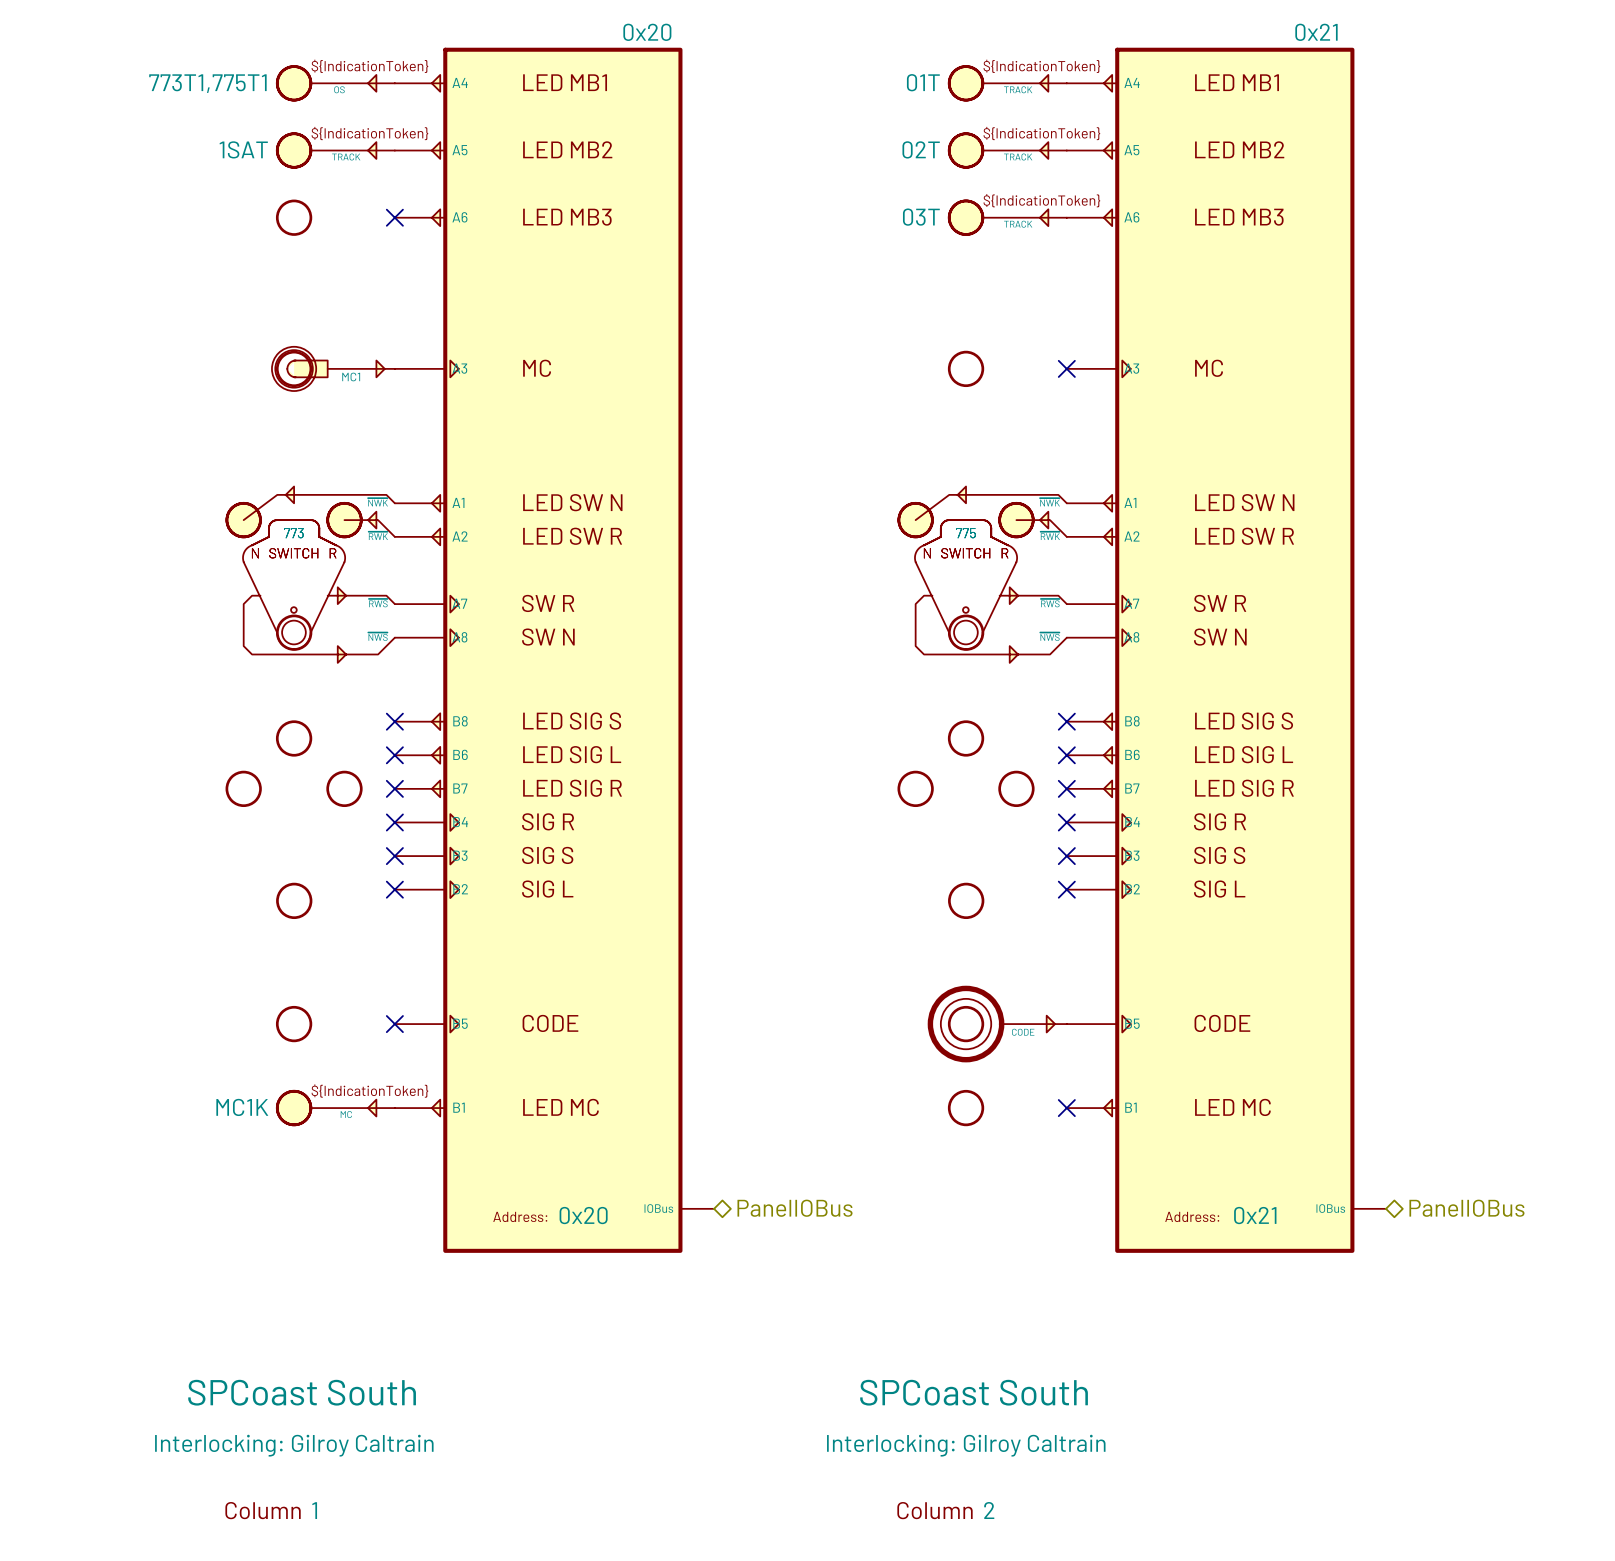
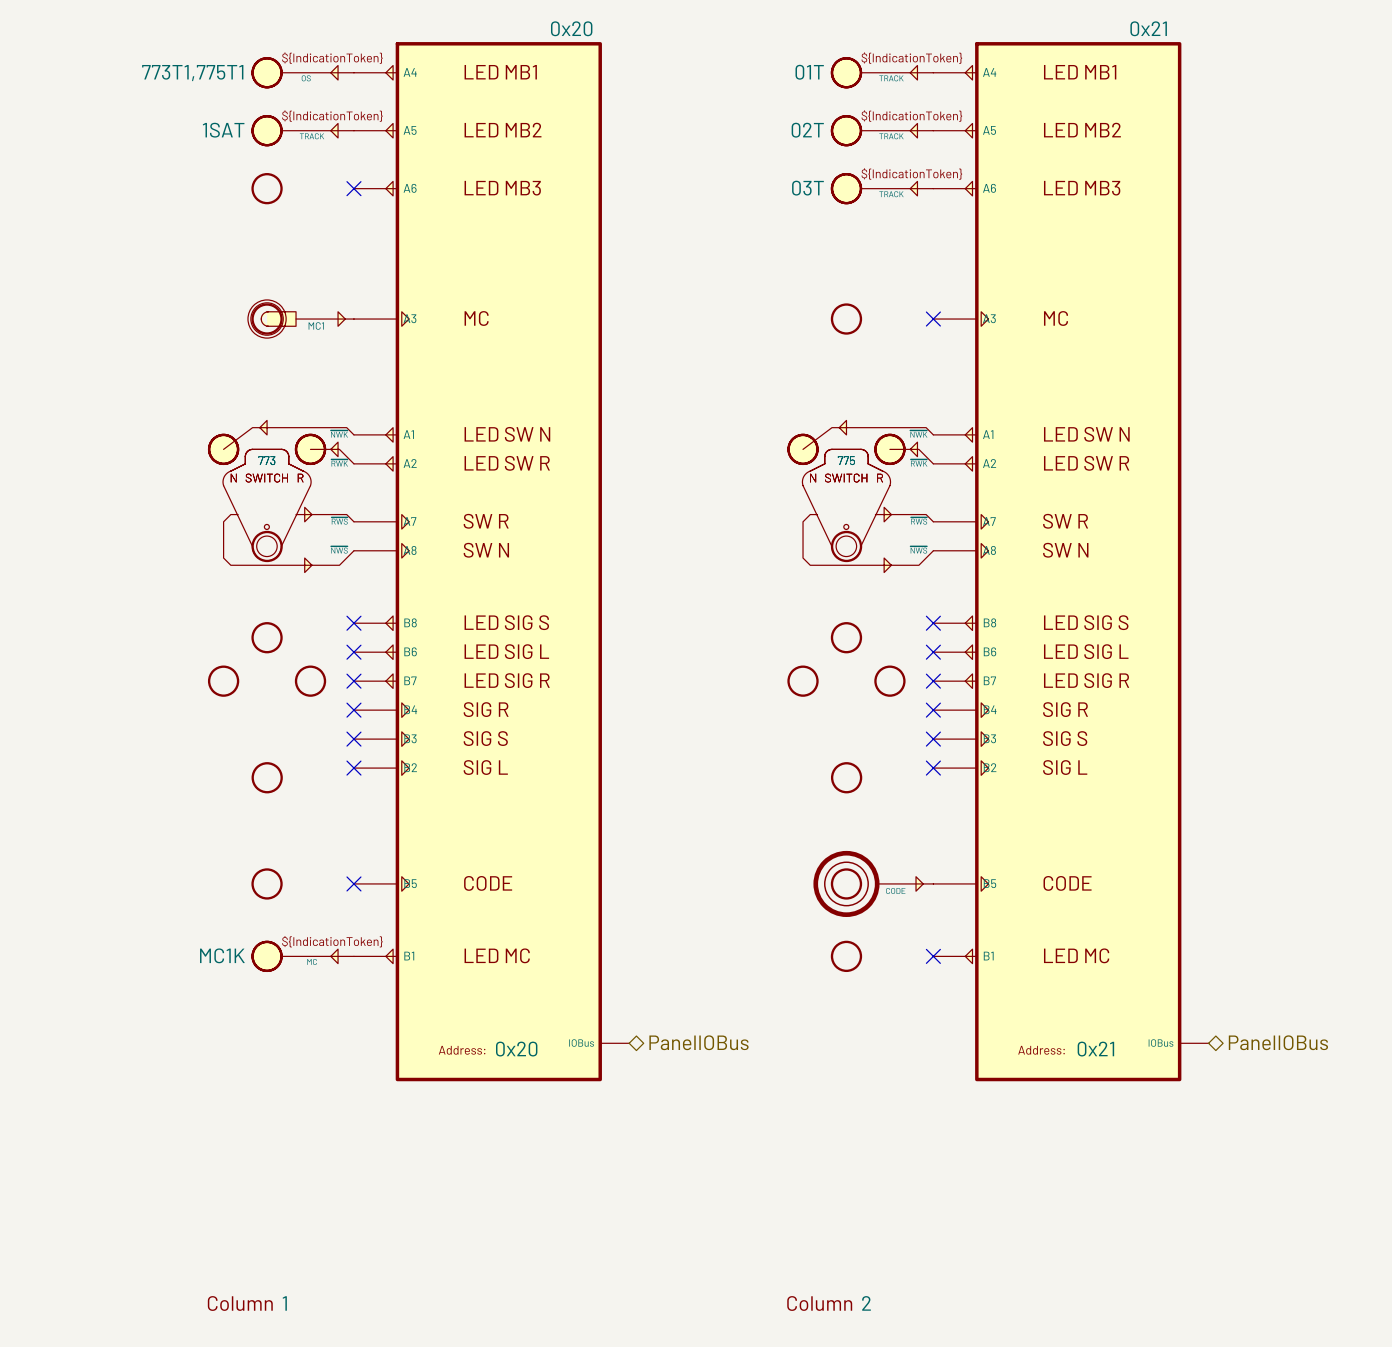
part text: SPCoast South (302, 1392) -> none
part text: SPCoast South (974, 1392) -> none
part text: Interlocking: Gilroy Caltrain (294, 1445) -> none
part text: Interlocking: Gilroy Caltrain (966, 1445) -> none

